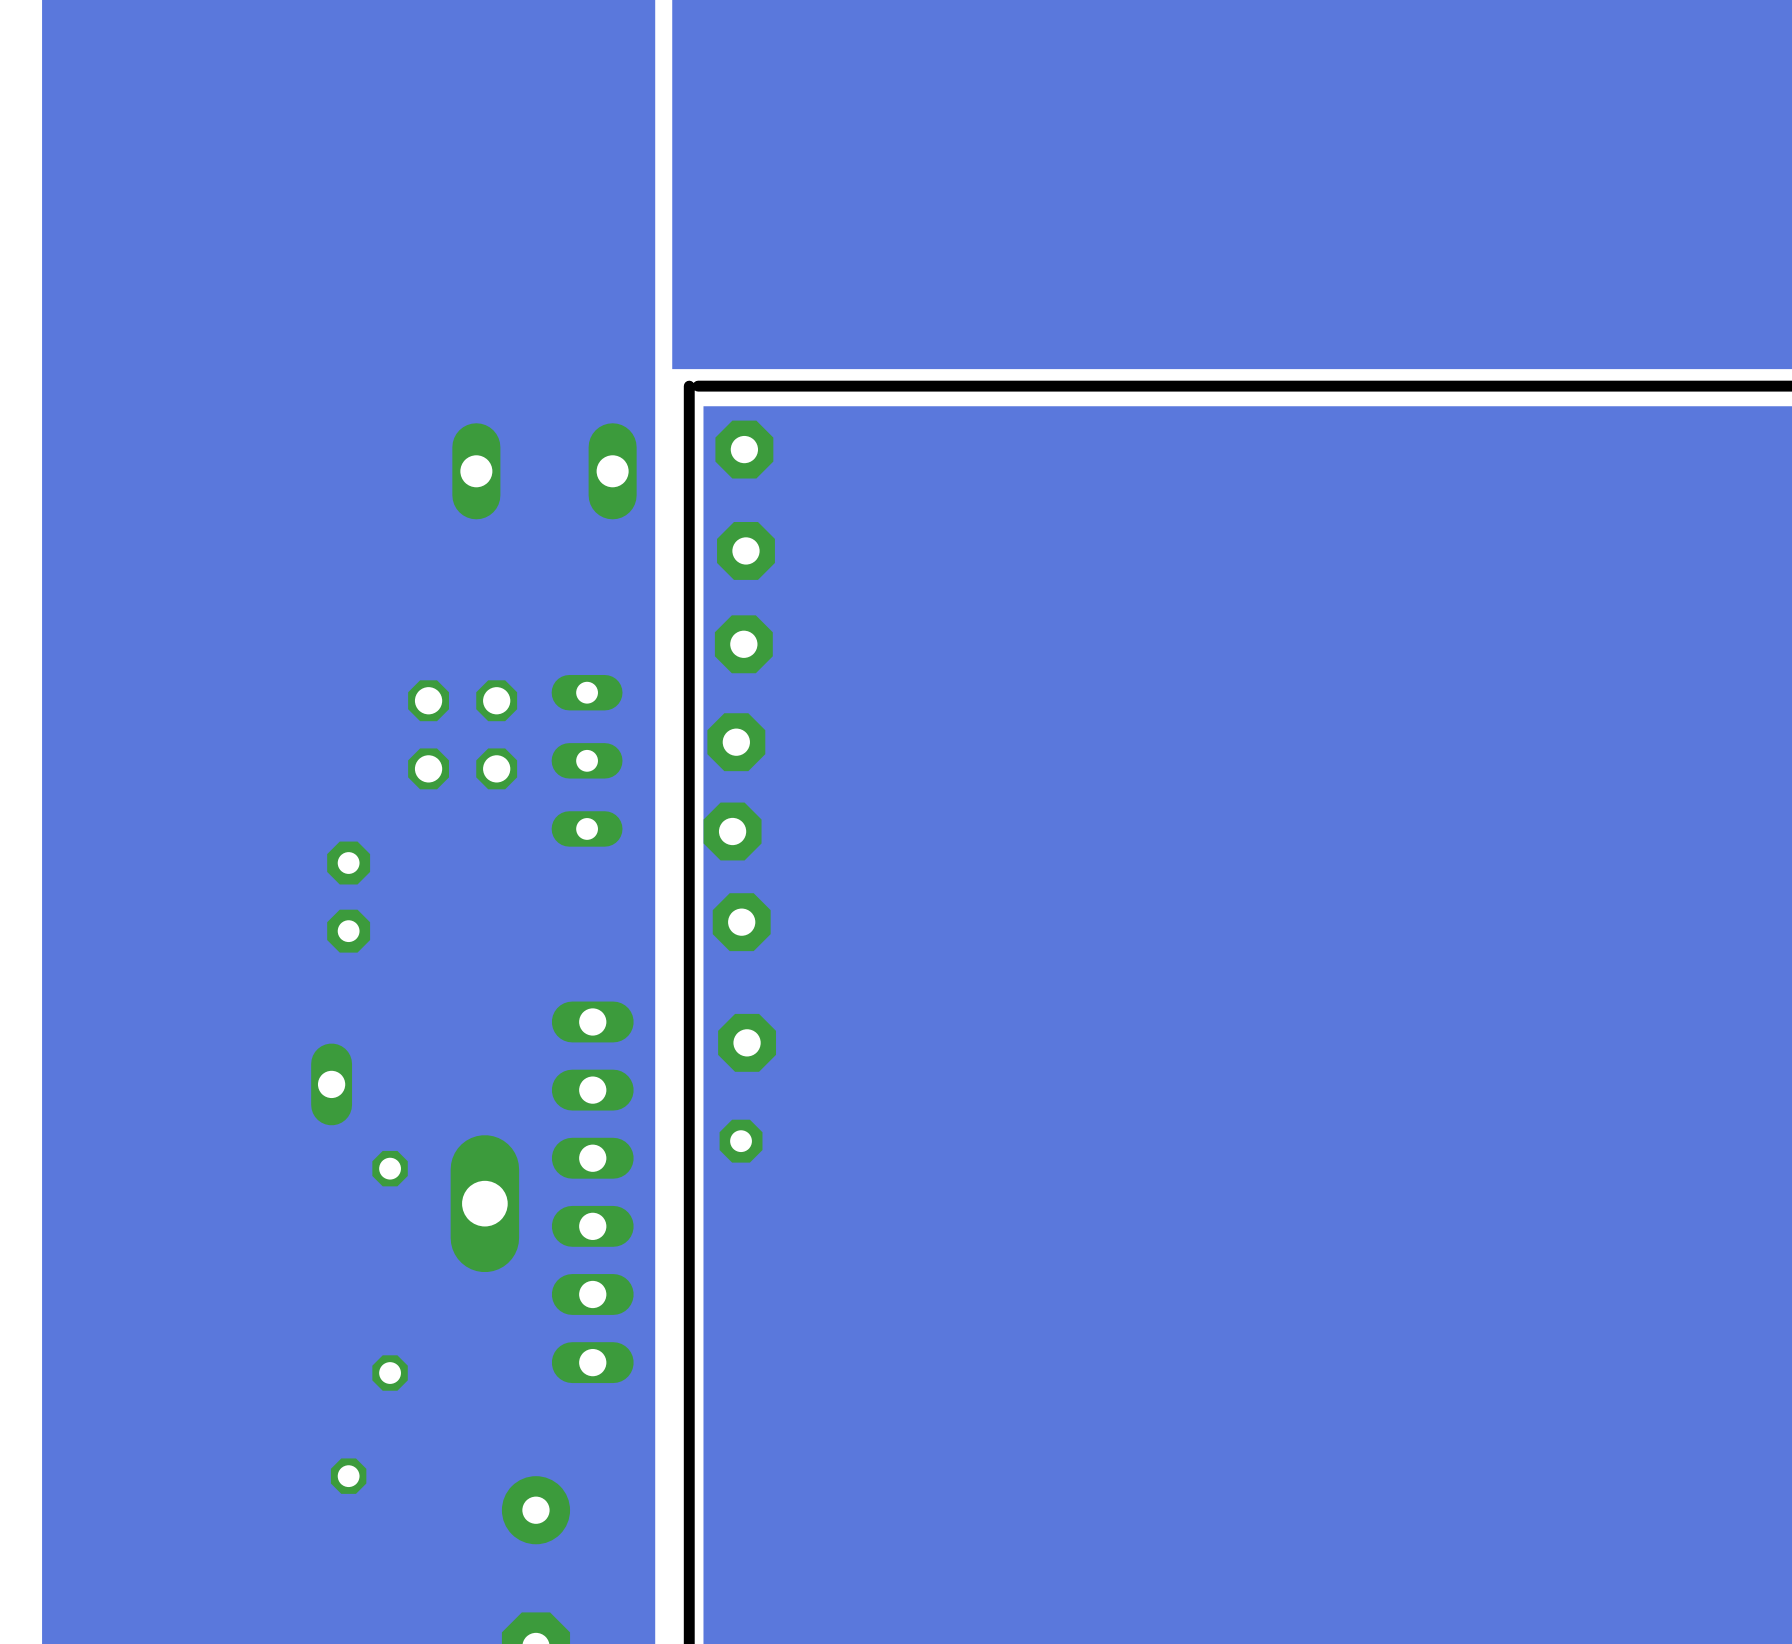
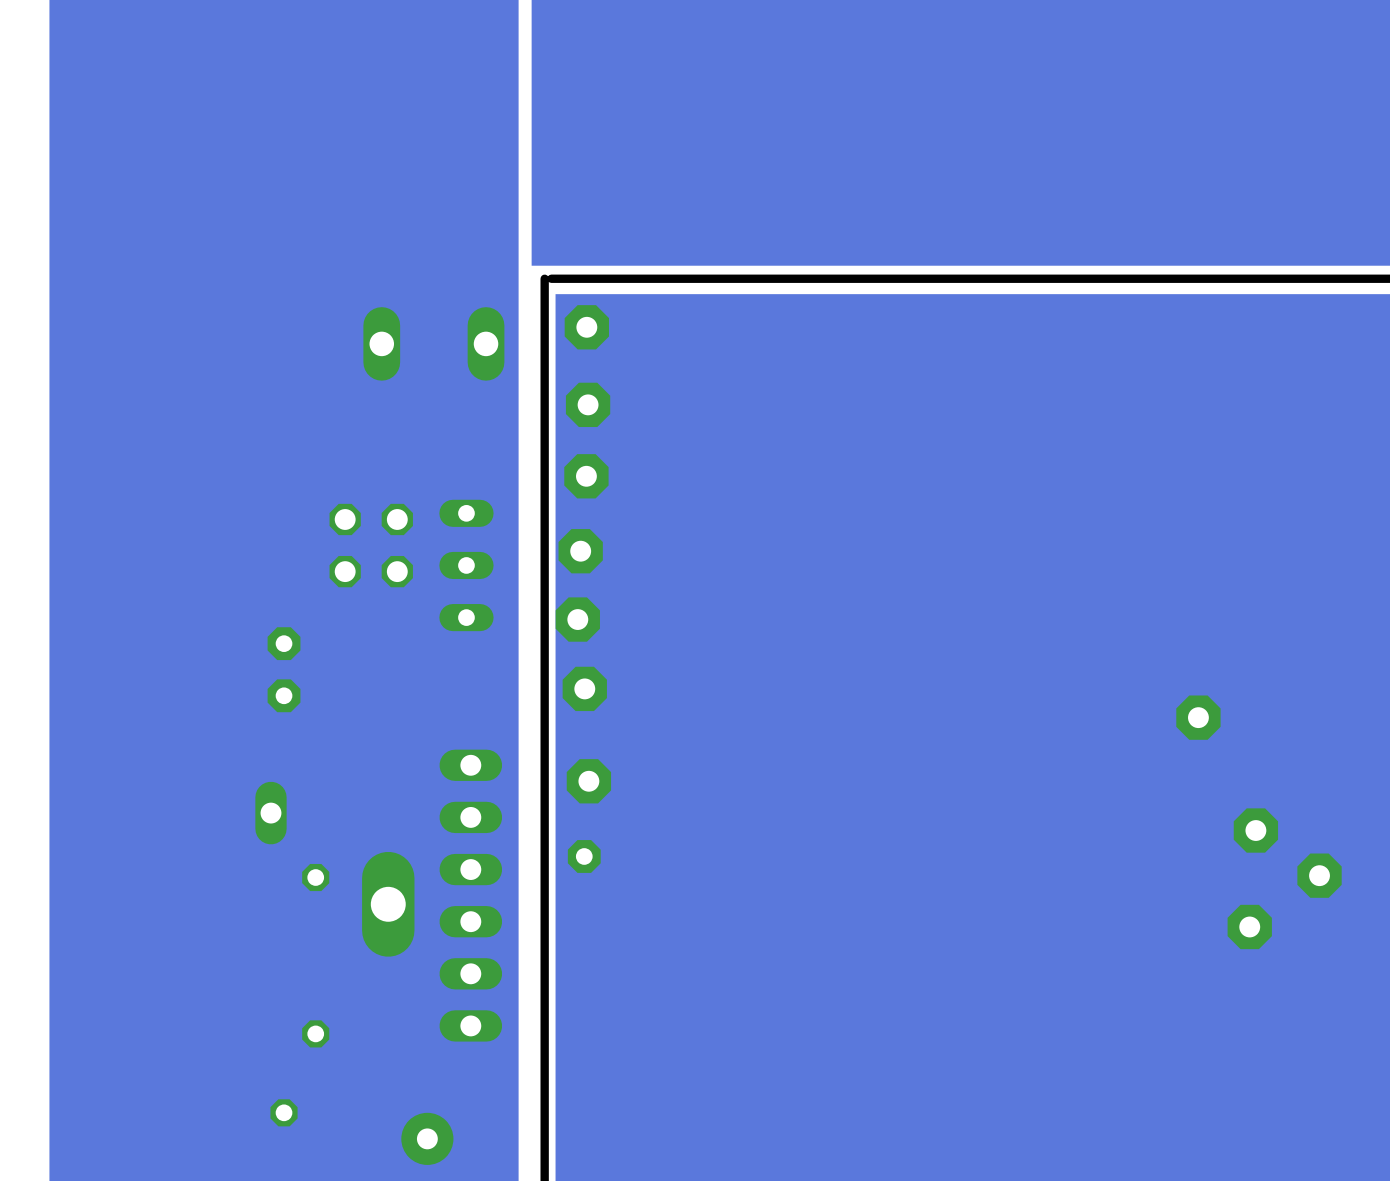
part: none -> (1198, 717)
part: none -> (1255, 830)
part: none -> (1319, 875)
part: none -> (1249, 926)

